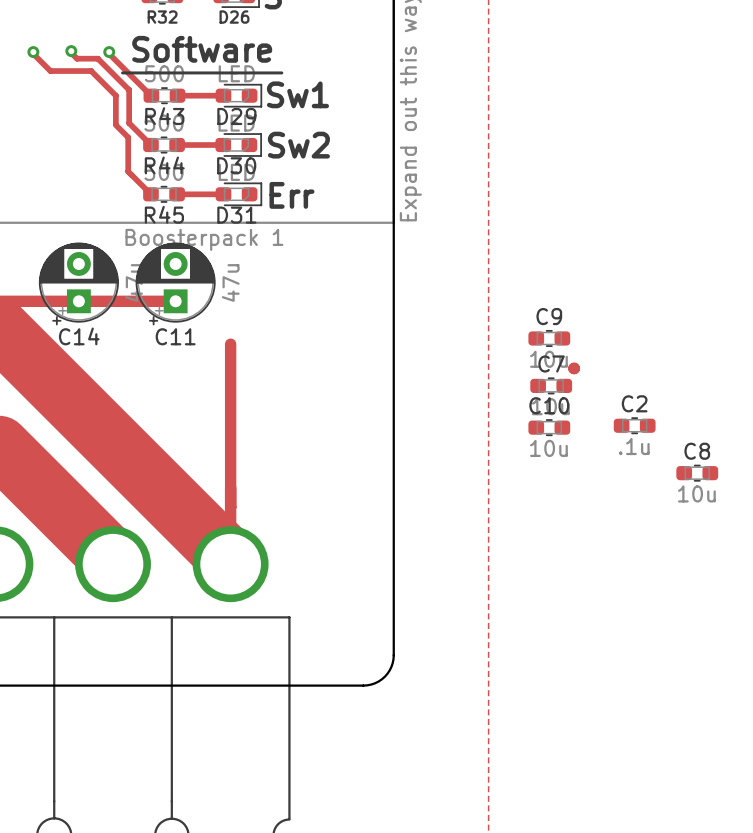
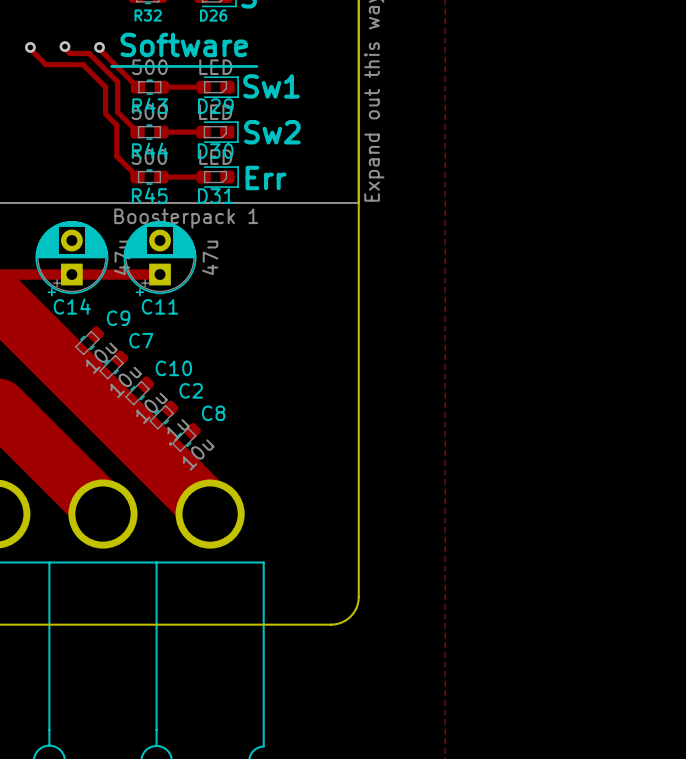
C9 name position: C9 (549, 316) -> C9 (118, 318)
C9 rotation: 0° (549, 338) -> 45° counterclockwise (87, 342)
C9 position: (549, 338) -> (87, 342)
track: (230, 344) (230, 560) -> none
C7 name position: C7 (551, 363) -> C7 (141, 340)
track: (574, 368) (573, 368) -> none
C7 rotation: 0° (551, 385) -> 45° counterclockwise (111, 367)
C7 position: (551, 385) -> (111, 367)
C2 name position: C2 (634, 403) -> C2 (191, 390)
C10 name position: C10 (549, 405) -> C10 (173, 368)
C2 rotation: 0° (634, 425) -> 45° counterclockwise (161, 417)
C2 position: (634, 425) -> (161, 417)
C10 rotation: 0° (549, 427) -> 45° counterclockwise (137, 393)
C10 position: (549, 427) -> (137, 393)
C8 name position: C8 (697, 451) -> C8 (213, 413)
C8 rotation: 0° (697, 473) -> 45° counterclockwise (184, 439)
C8 position: (697, 473) -> (184, 439)

